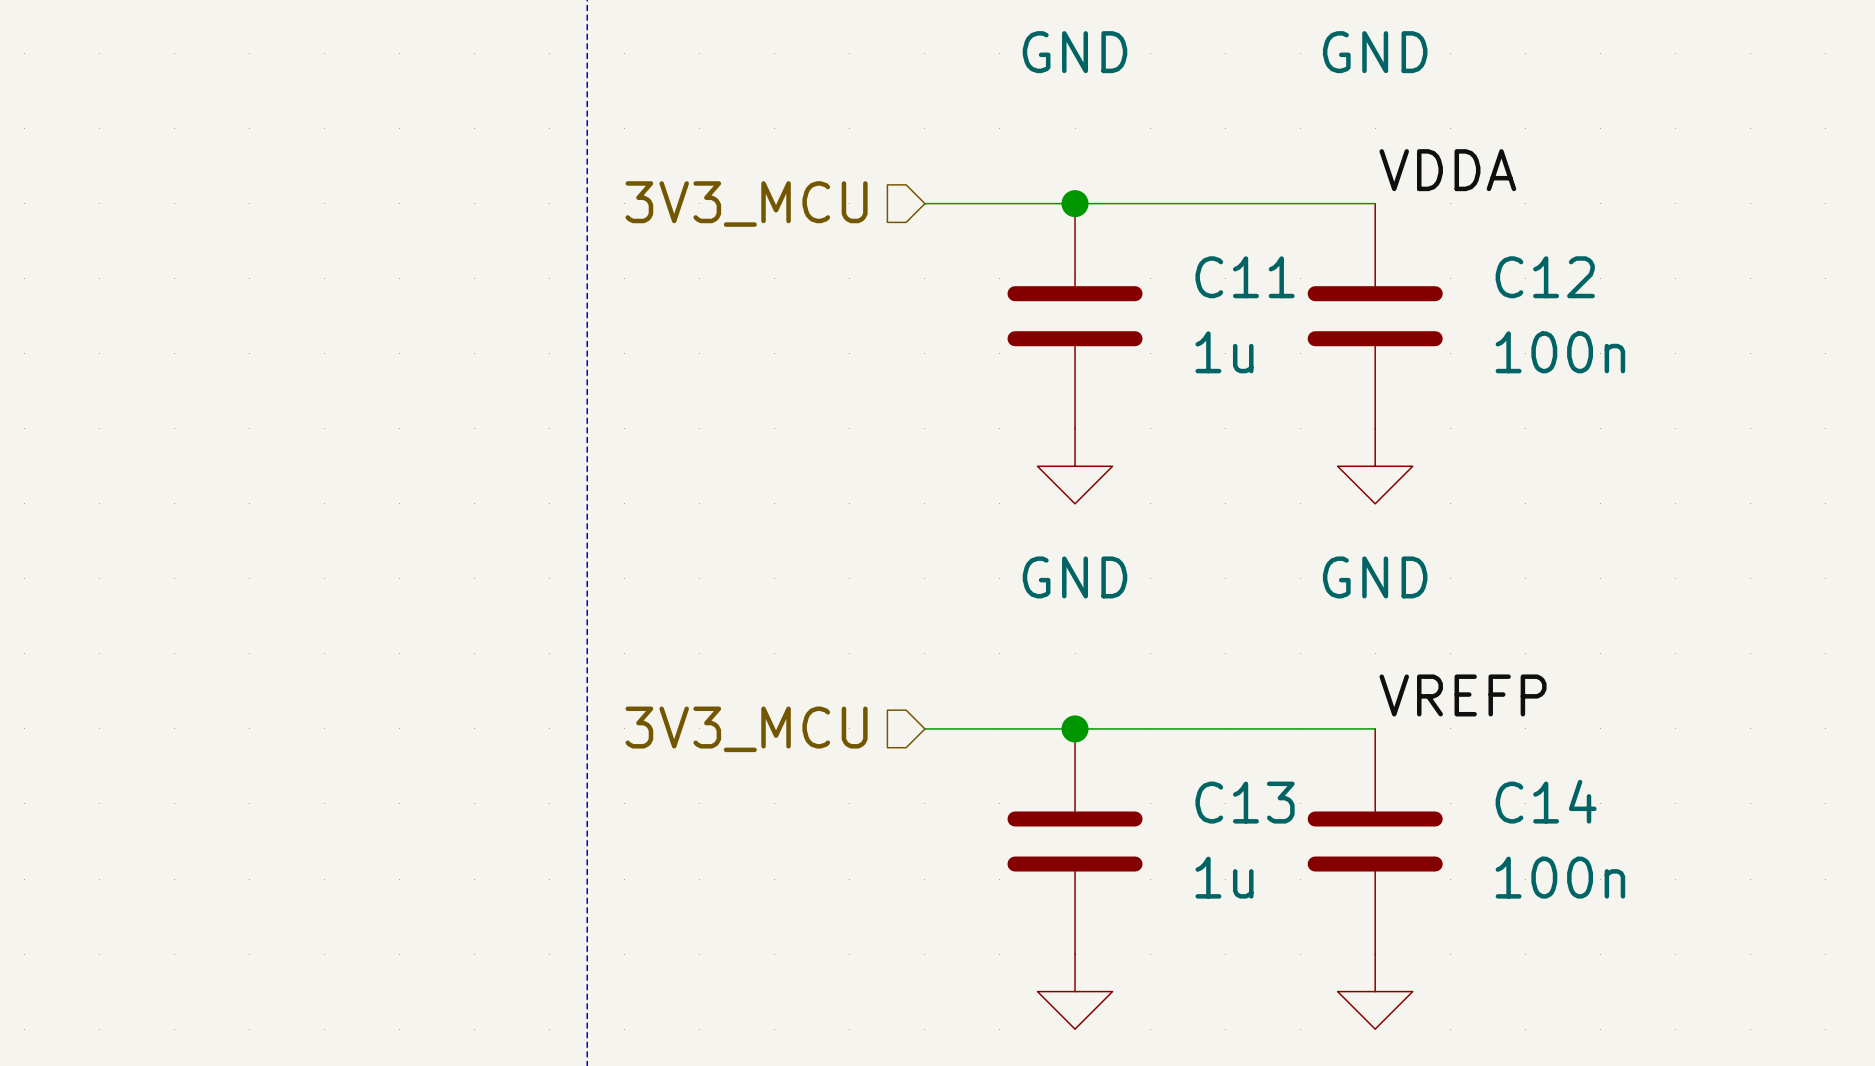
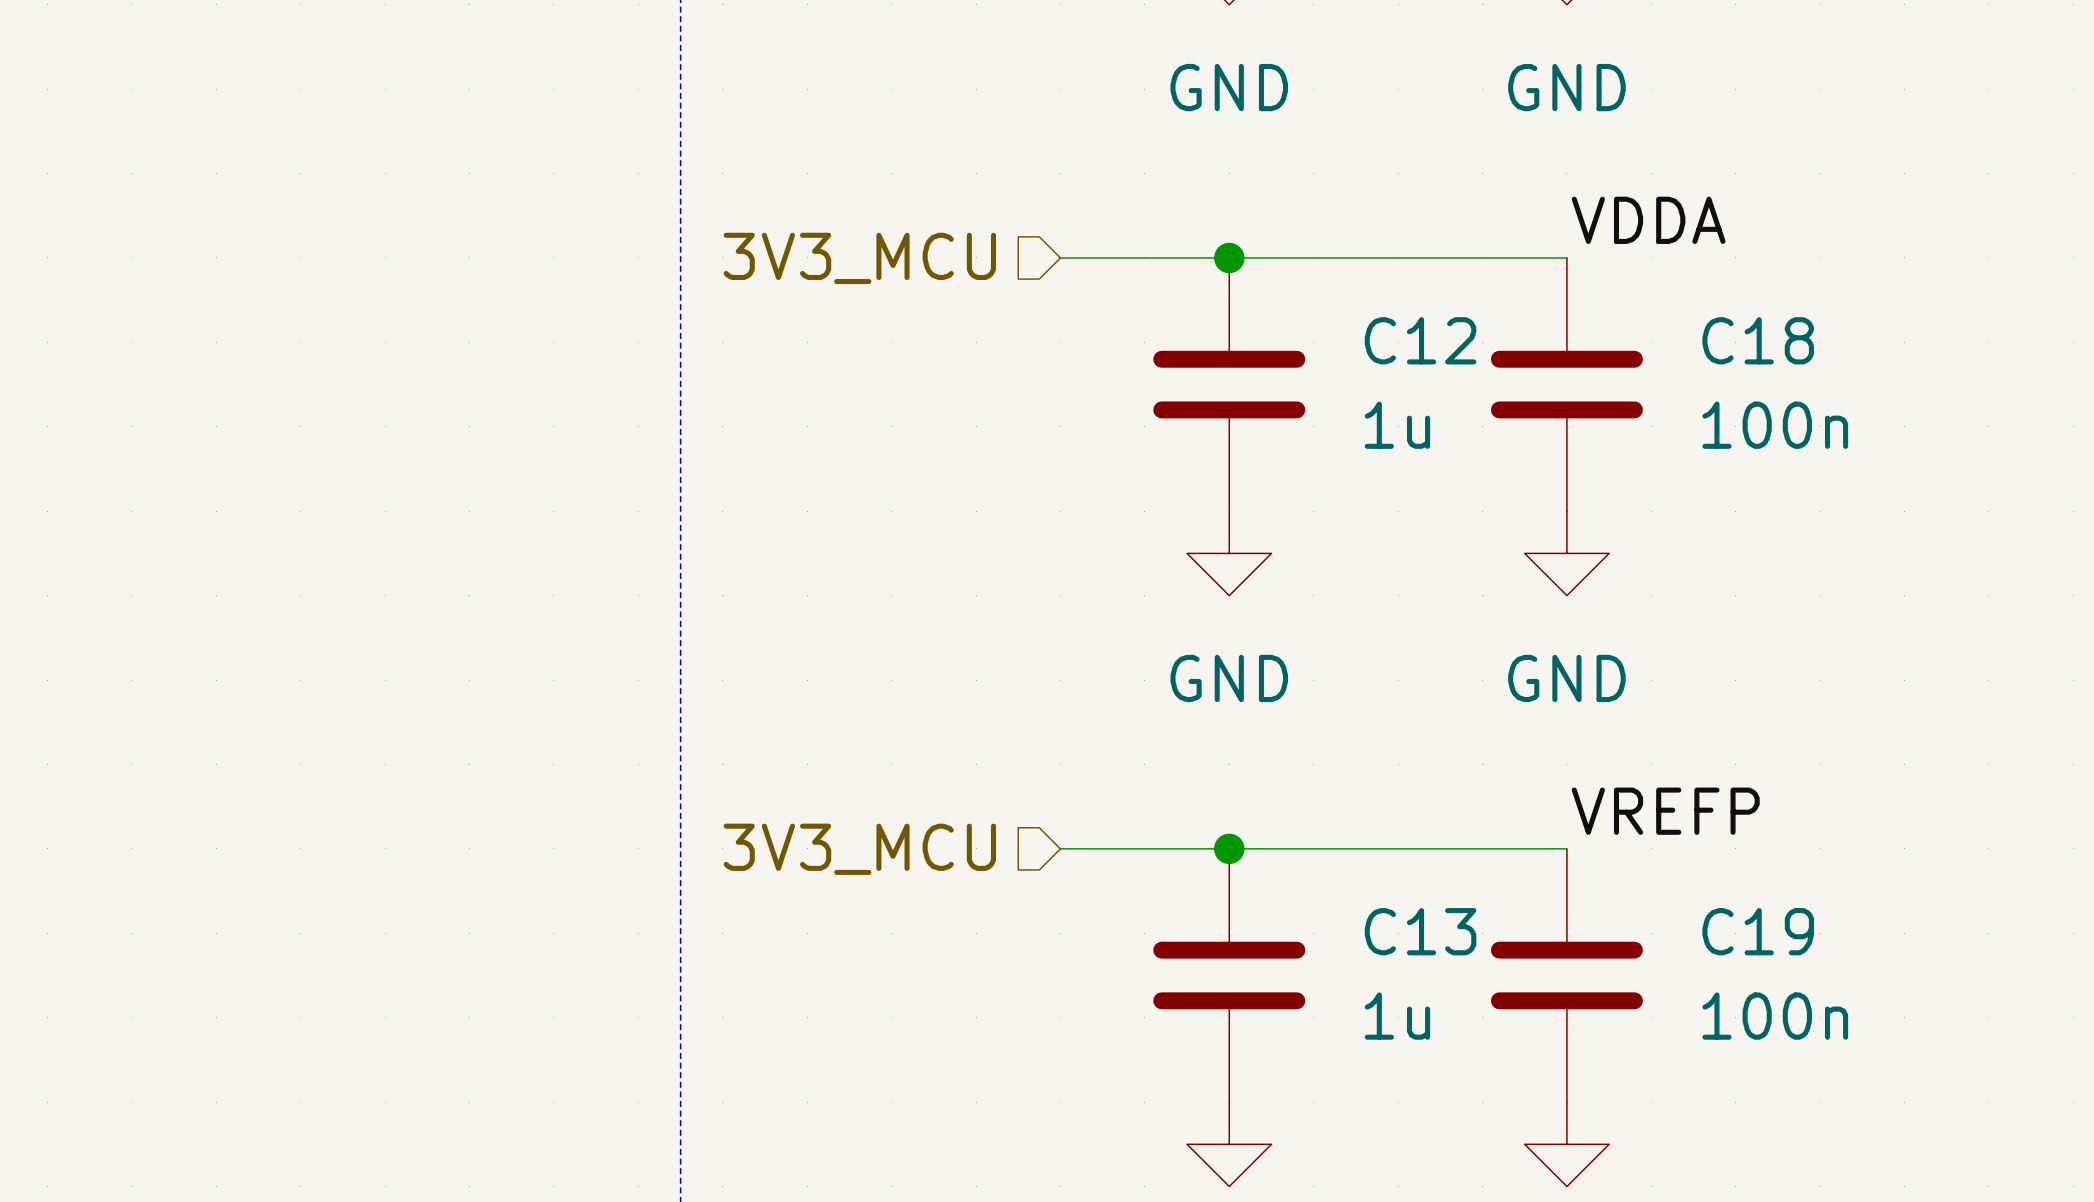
C11 name: C11 (1245, 277) -> C12 (1420, 340)
C12 name: C12 (1545, 277) -> C18 (1758, 340)
C14 name: C14 (1546, 801) -> C19 (1758, 931)

